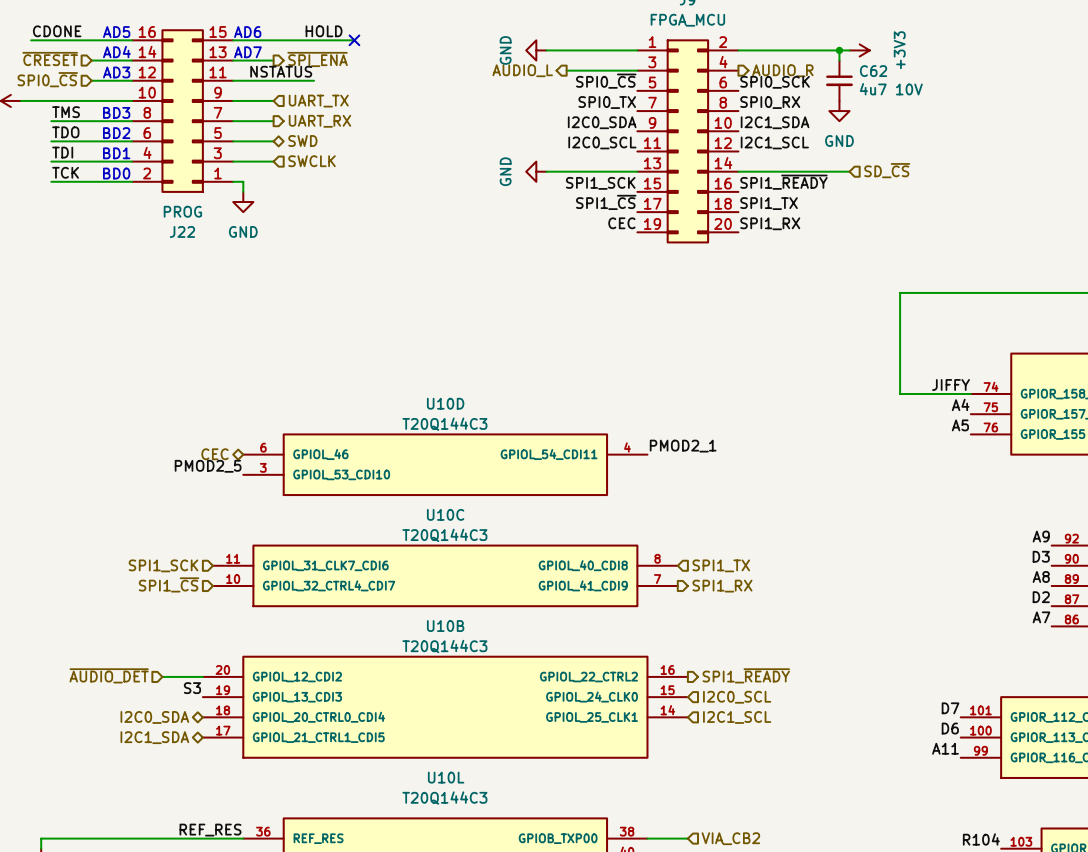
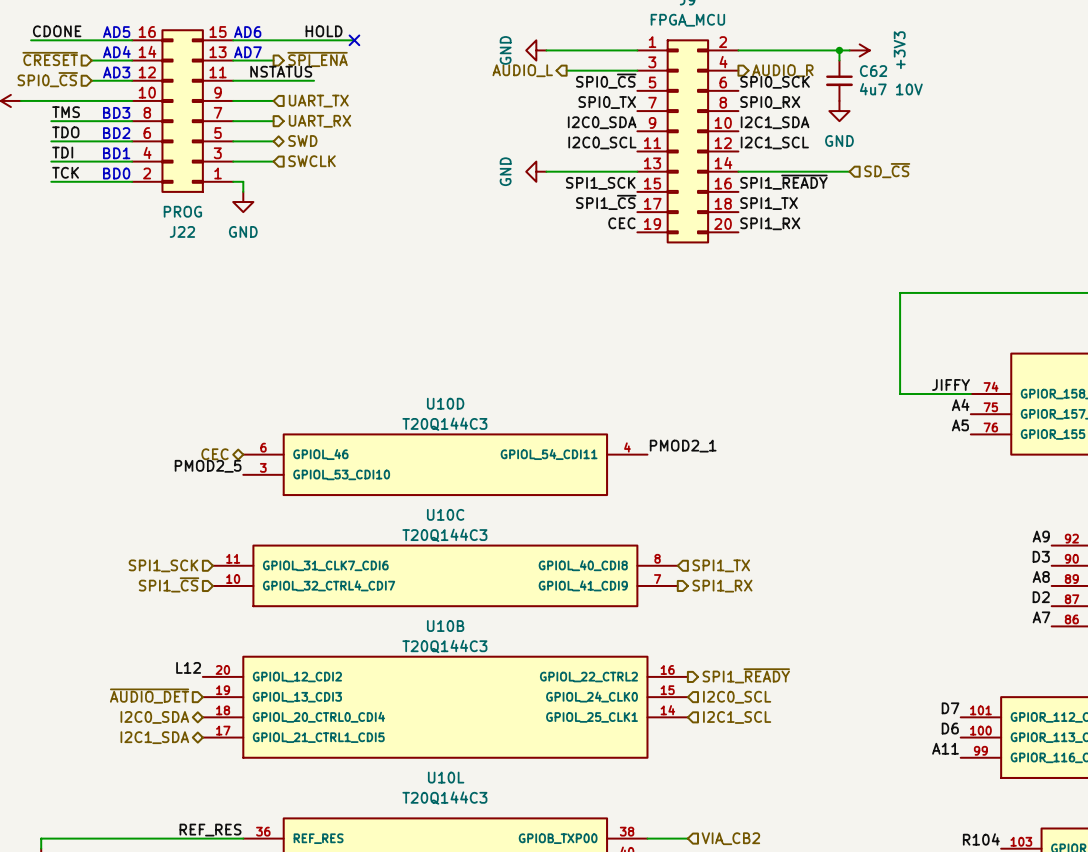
label: none -> L12 (188, 667)
hierarchical label position: ~{AUDIO_DET} (109, 675) -> ~{AUDIO_DET} (149, 696)
wire: (162, 676) (202, 676) -> none
label: S3 (192, 688) -> none

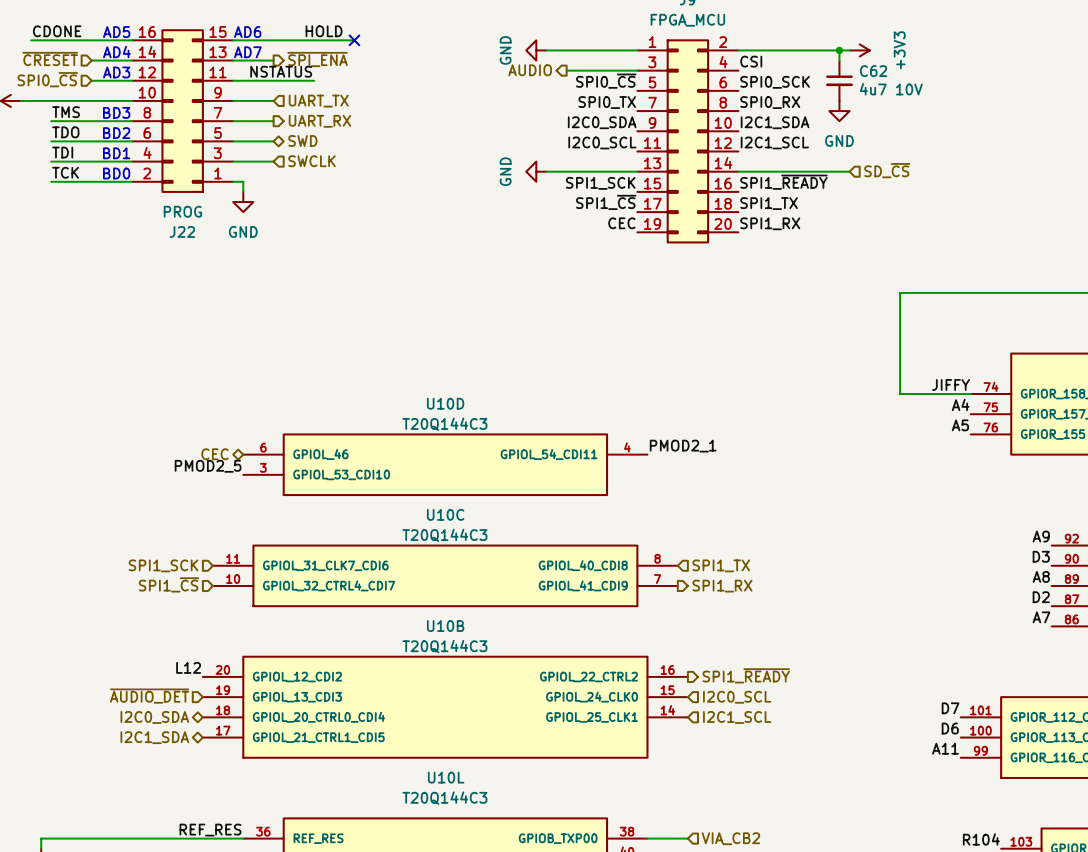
label: none -> CSI (751, 61)
hierarchical label: AUDIO_L (522, 70) -> AUDIO (530, 70)
hierarchical label: AUDIO_R (782, 70) -> none

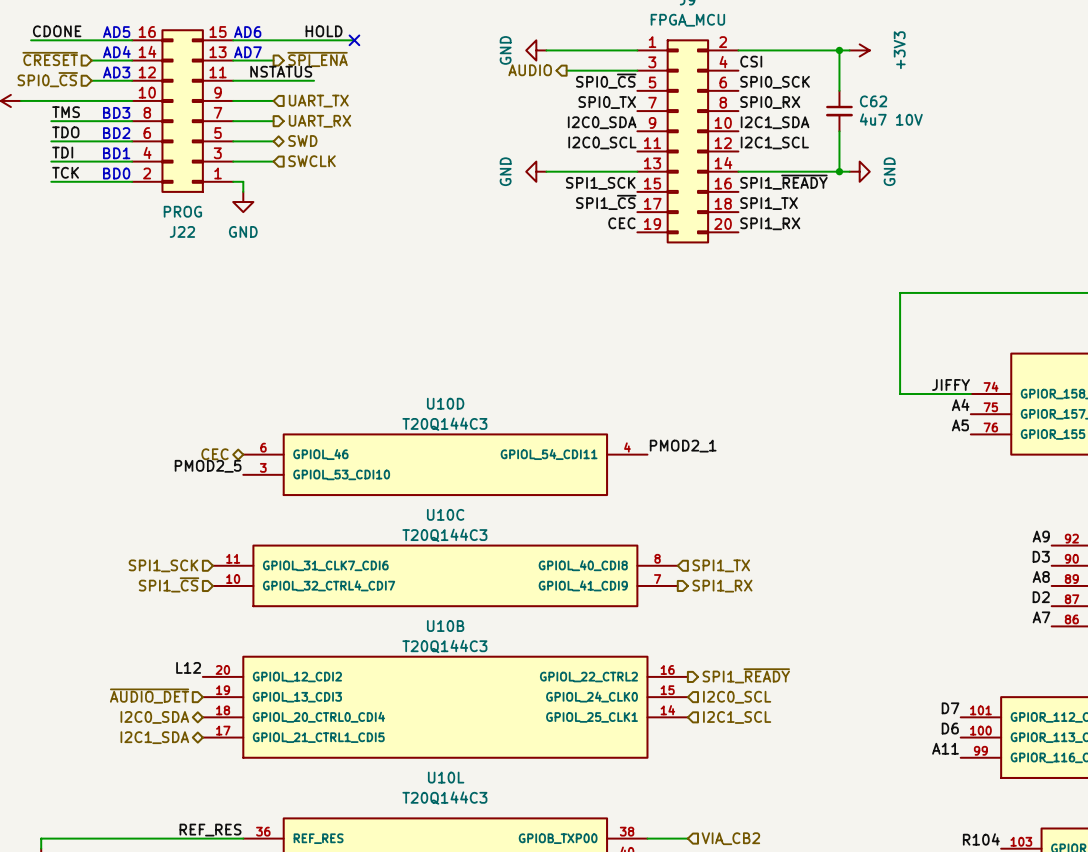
C62 position: (839, 80) -> (839, 111)
power symbol rotation: 0° (839, 111) -> 90° counterclockwise (859, 171)
power symbol position: GND (839, 111) -> GND (859, 171)
wire: none -> (839, 131) (839, 171)
hierarchical label: SD_~{CS} (887, 170) -> none
junction: none -> (839, 171)

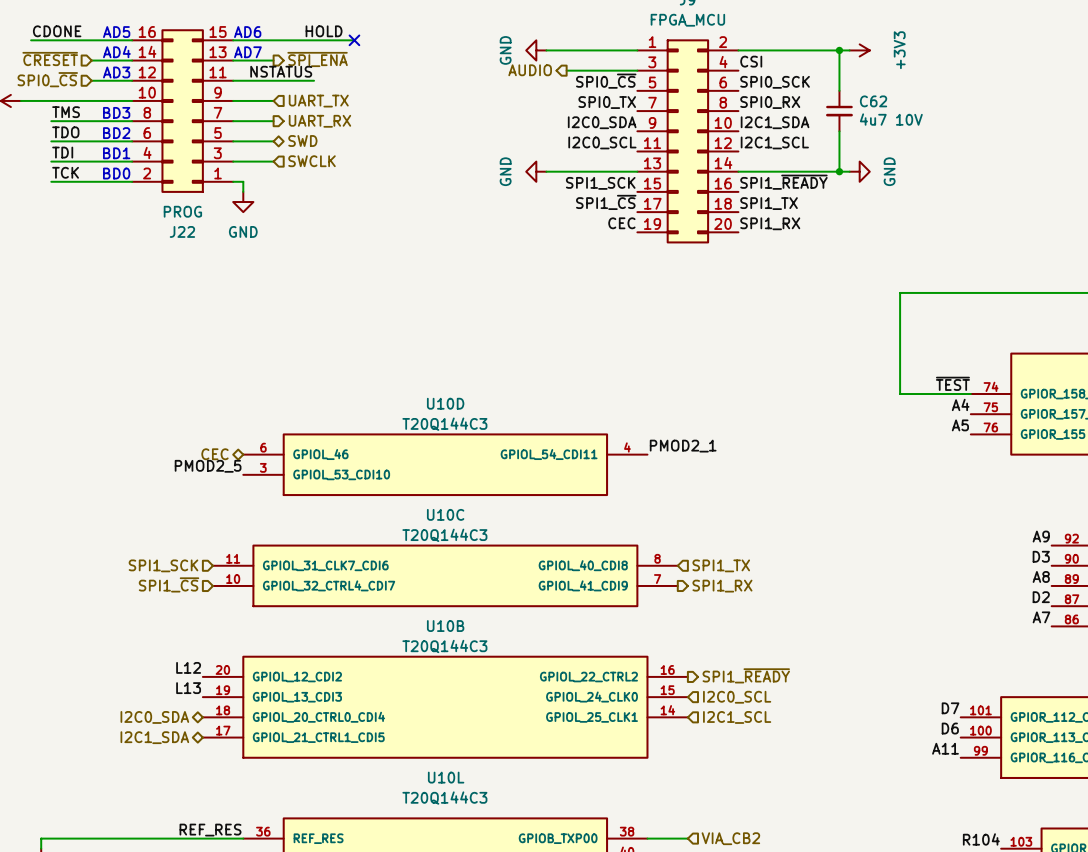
label: JIFFY (951, 384) -> ~{TEST} (952, 383)
label: none -> L13 (188, 688)
hierarchical label: ~{AUDIO_DET} (149, 696) -> none

